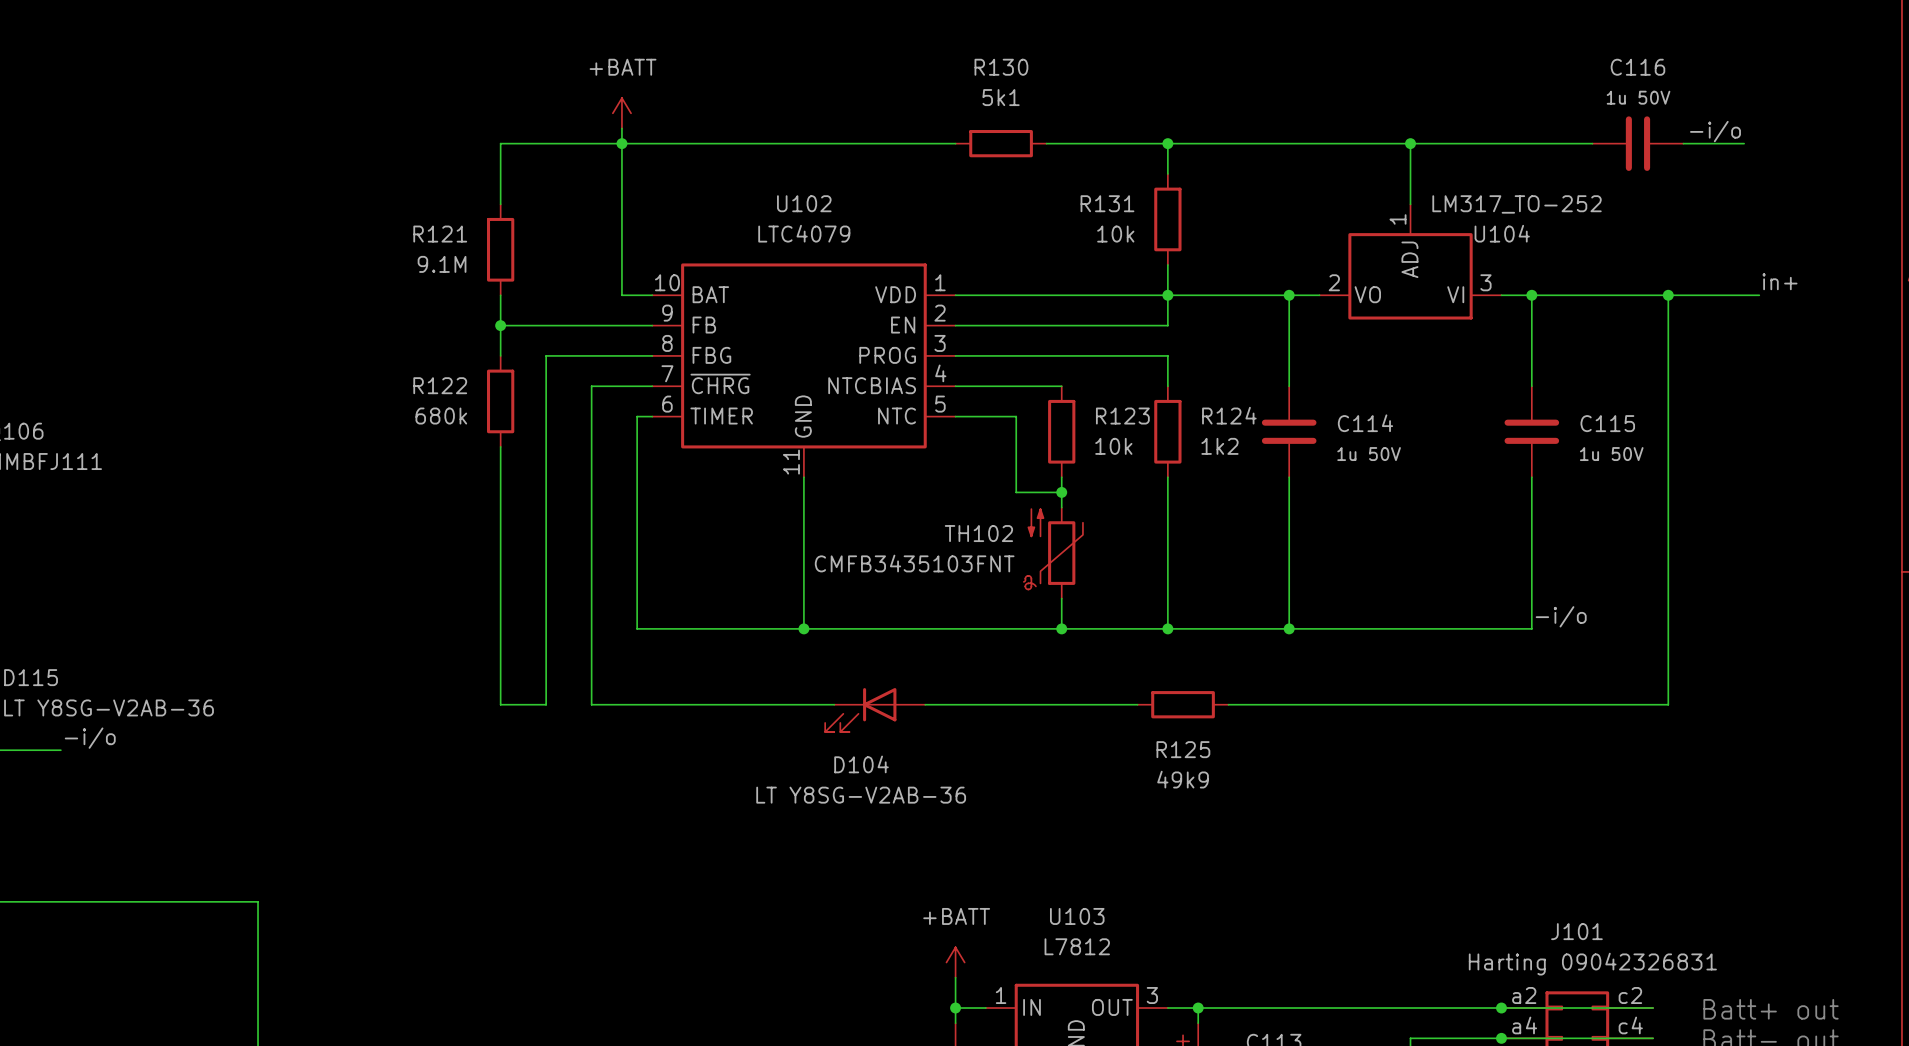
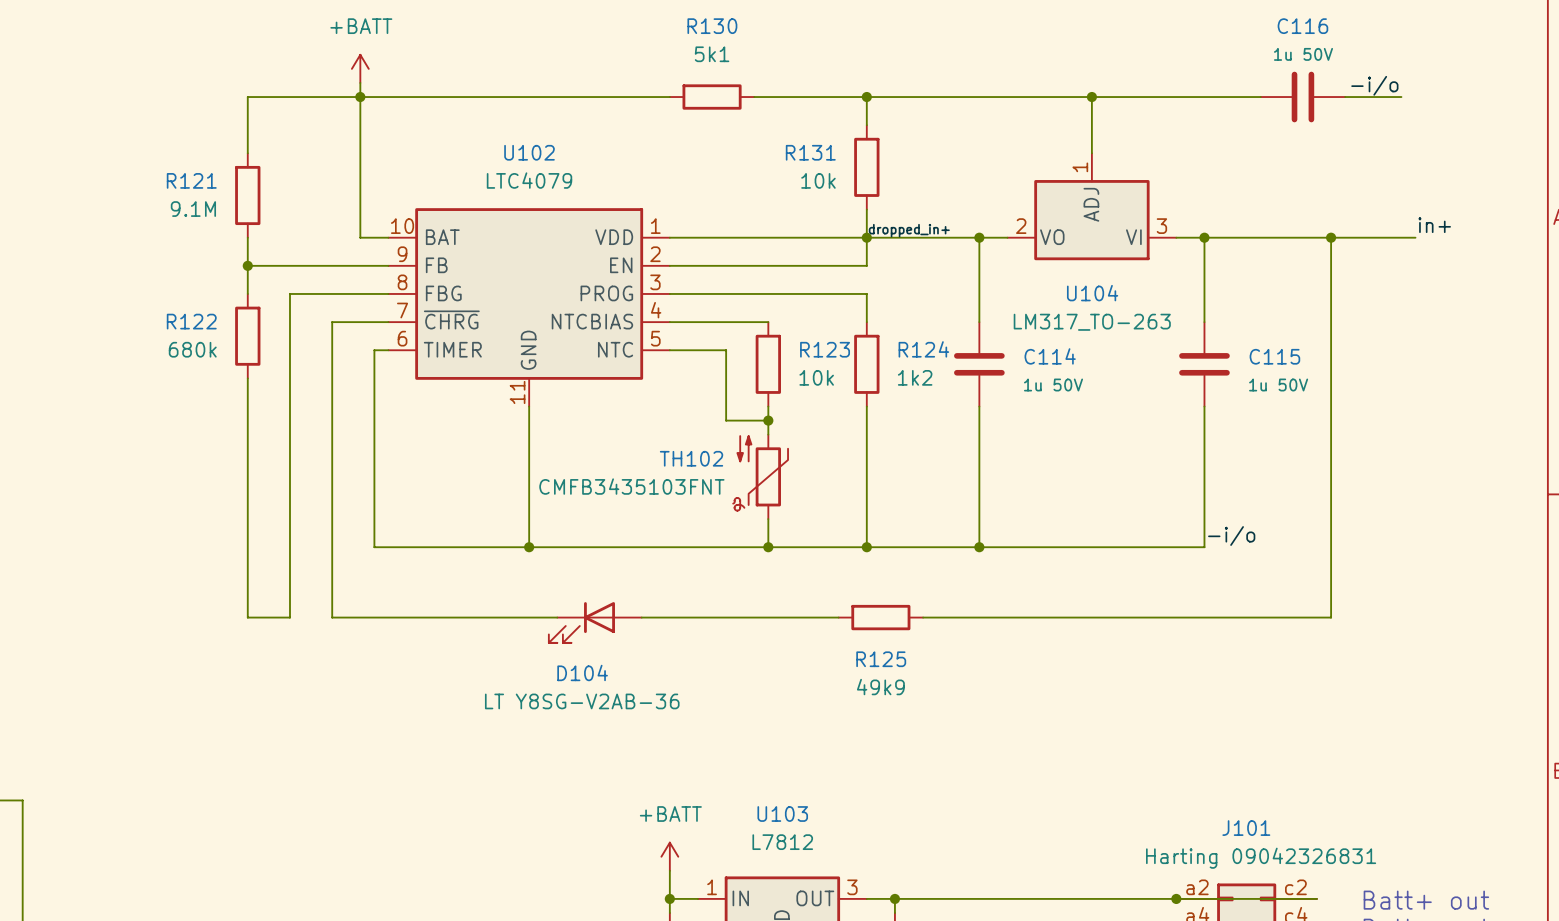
U104 value: LM317_TO-252 (1517, 204) -> LM317_TO-263 (1092, 322)
U104 name position: U104 (1502, 233) -> U104 (1092, 293)
label: none -> dropped_in+ (909, 230)

